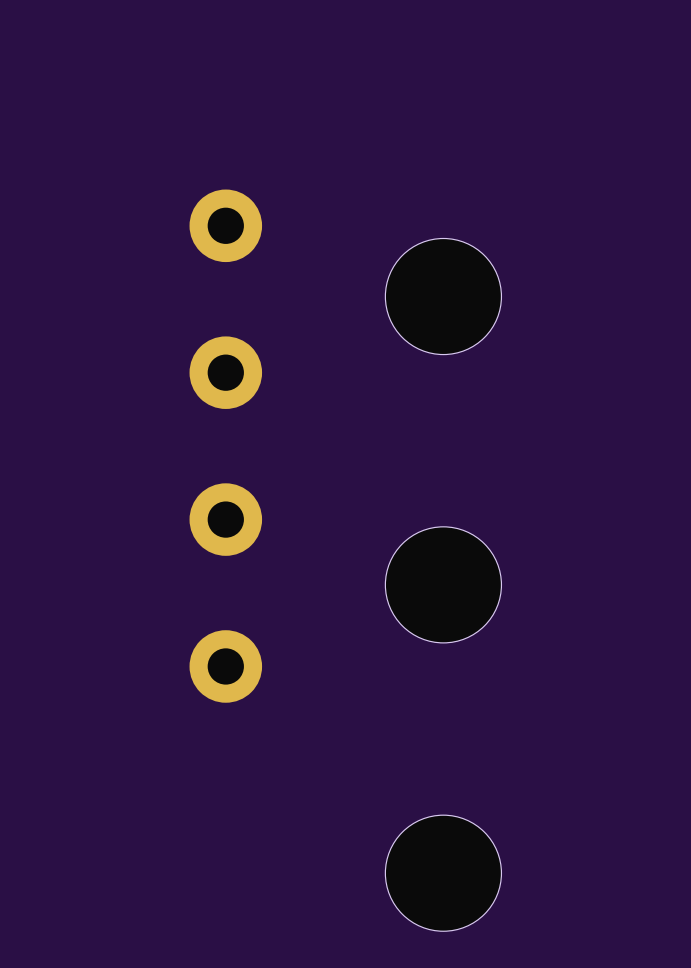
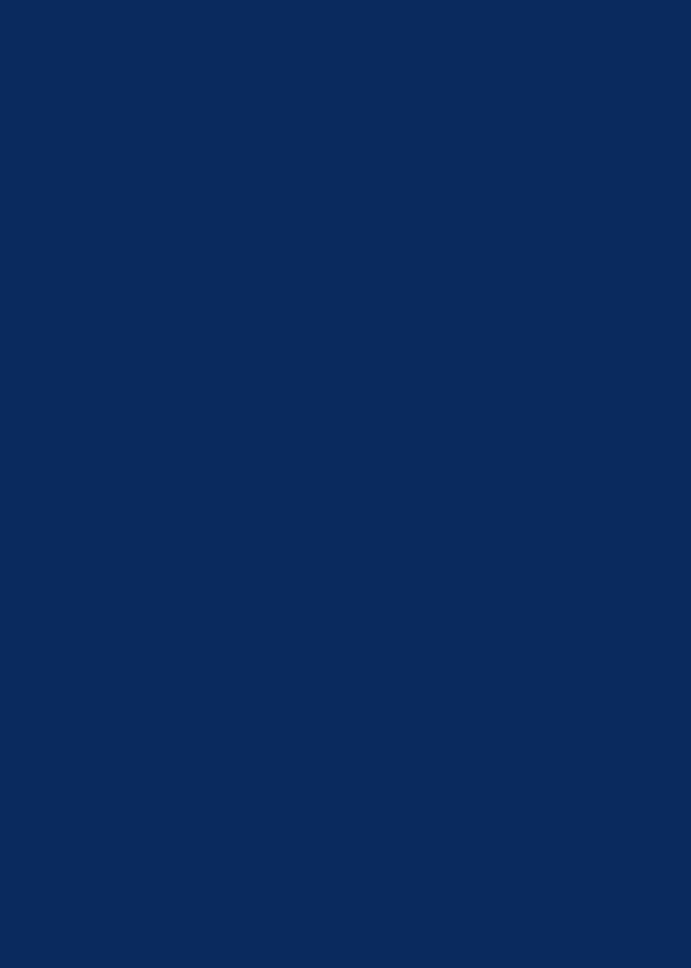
part: (225, 225) -> none
part: (443, 296) -> none
part: (225, 372) -> none
part: (225, 519) -> none
part: (443, 584) -> none
part: (225, 666) -> none
part: (443, 873) -> none

